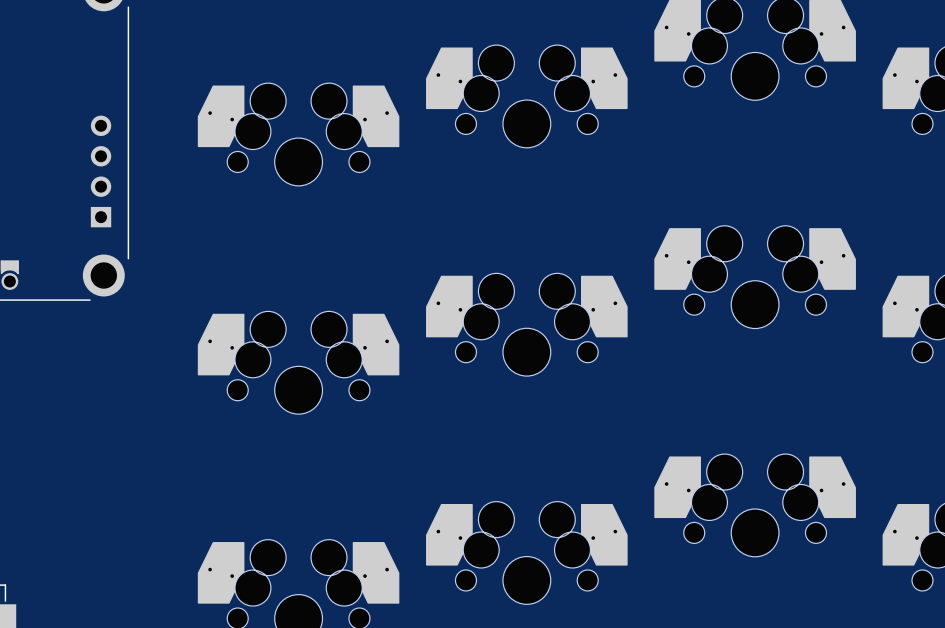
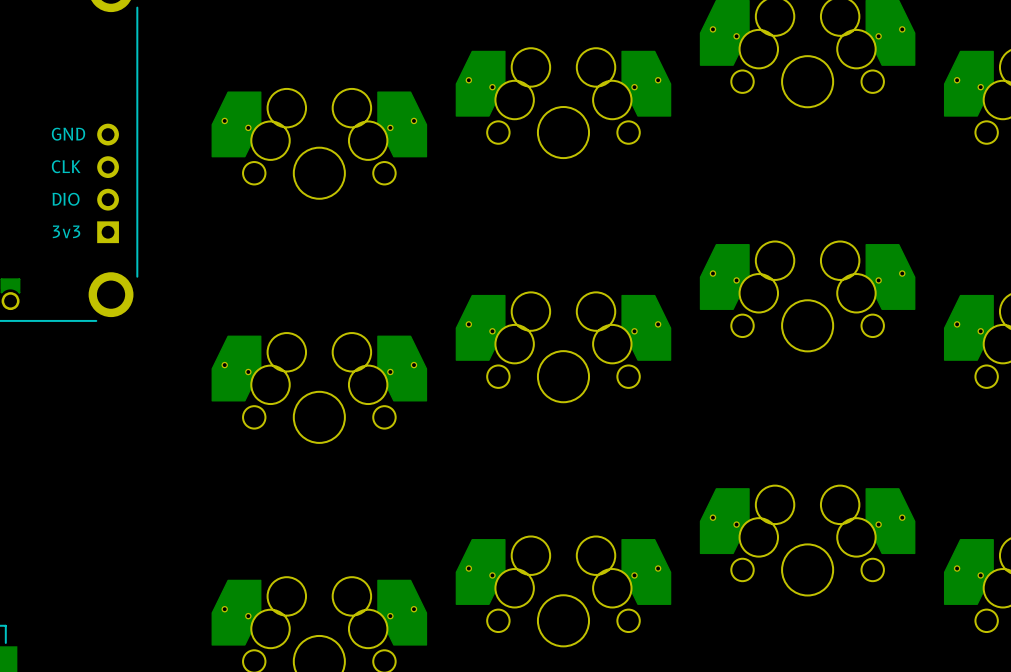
part text: none -> GND (68, 134)
part text: none -> CLK (66, 166)
part text: none -> DIO (66, 199)
part text: none -> 3v3 (66, 231)

